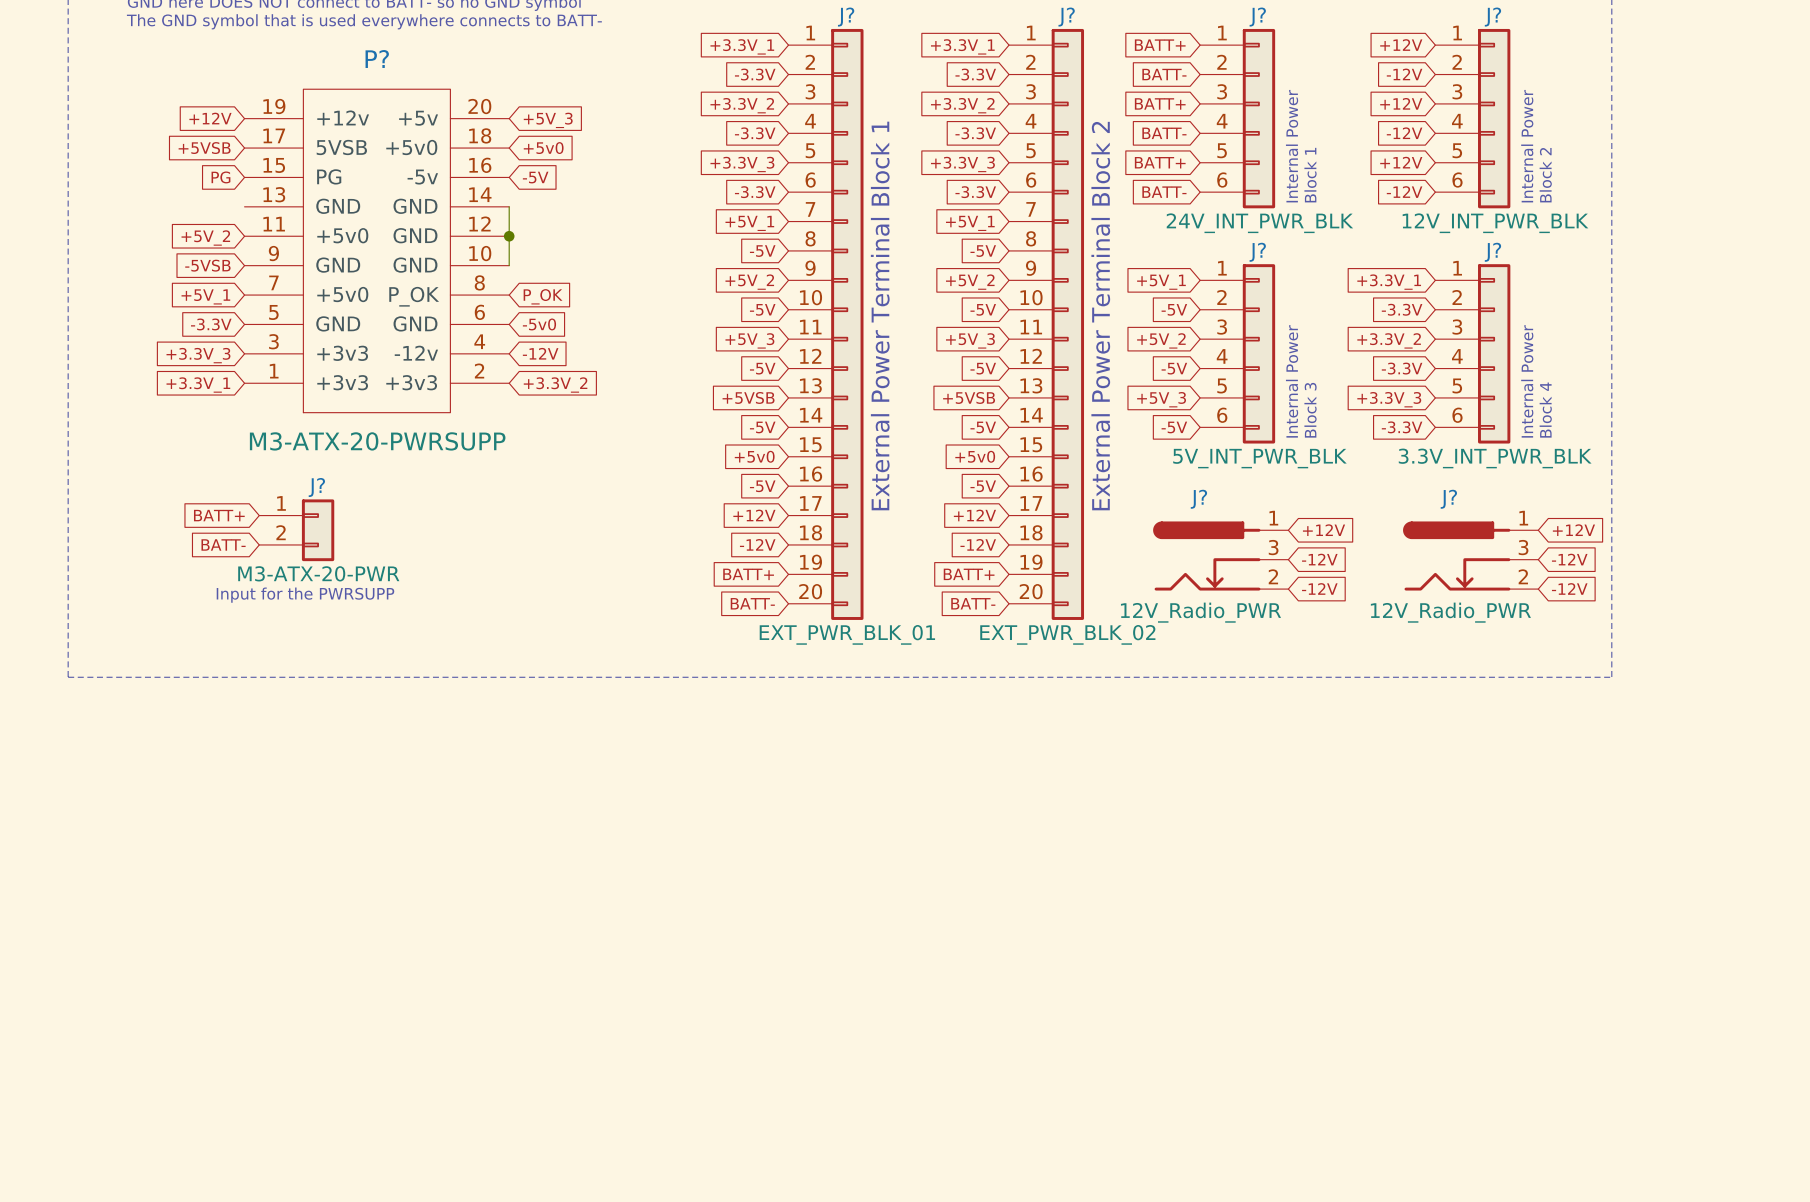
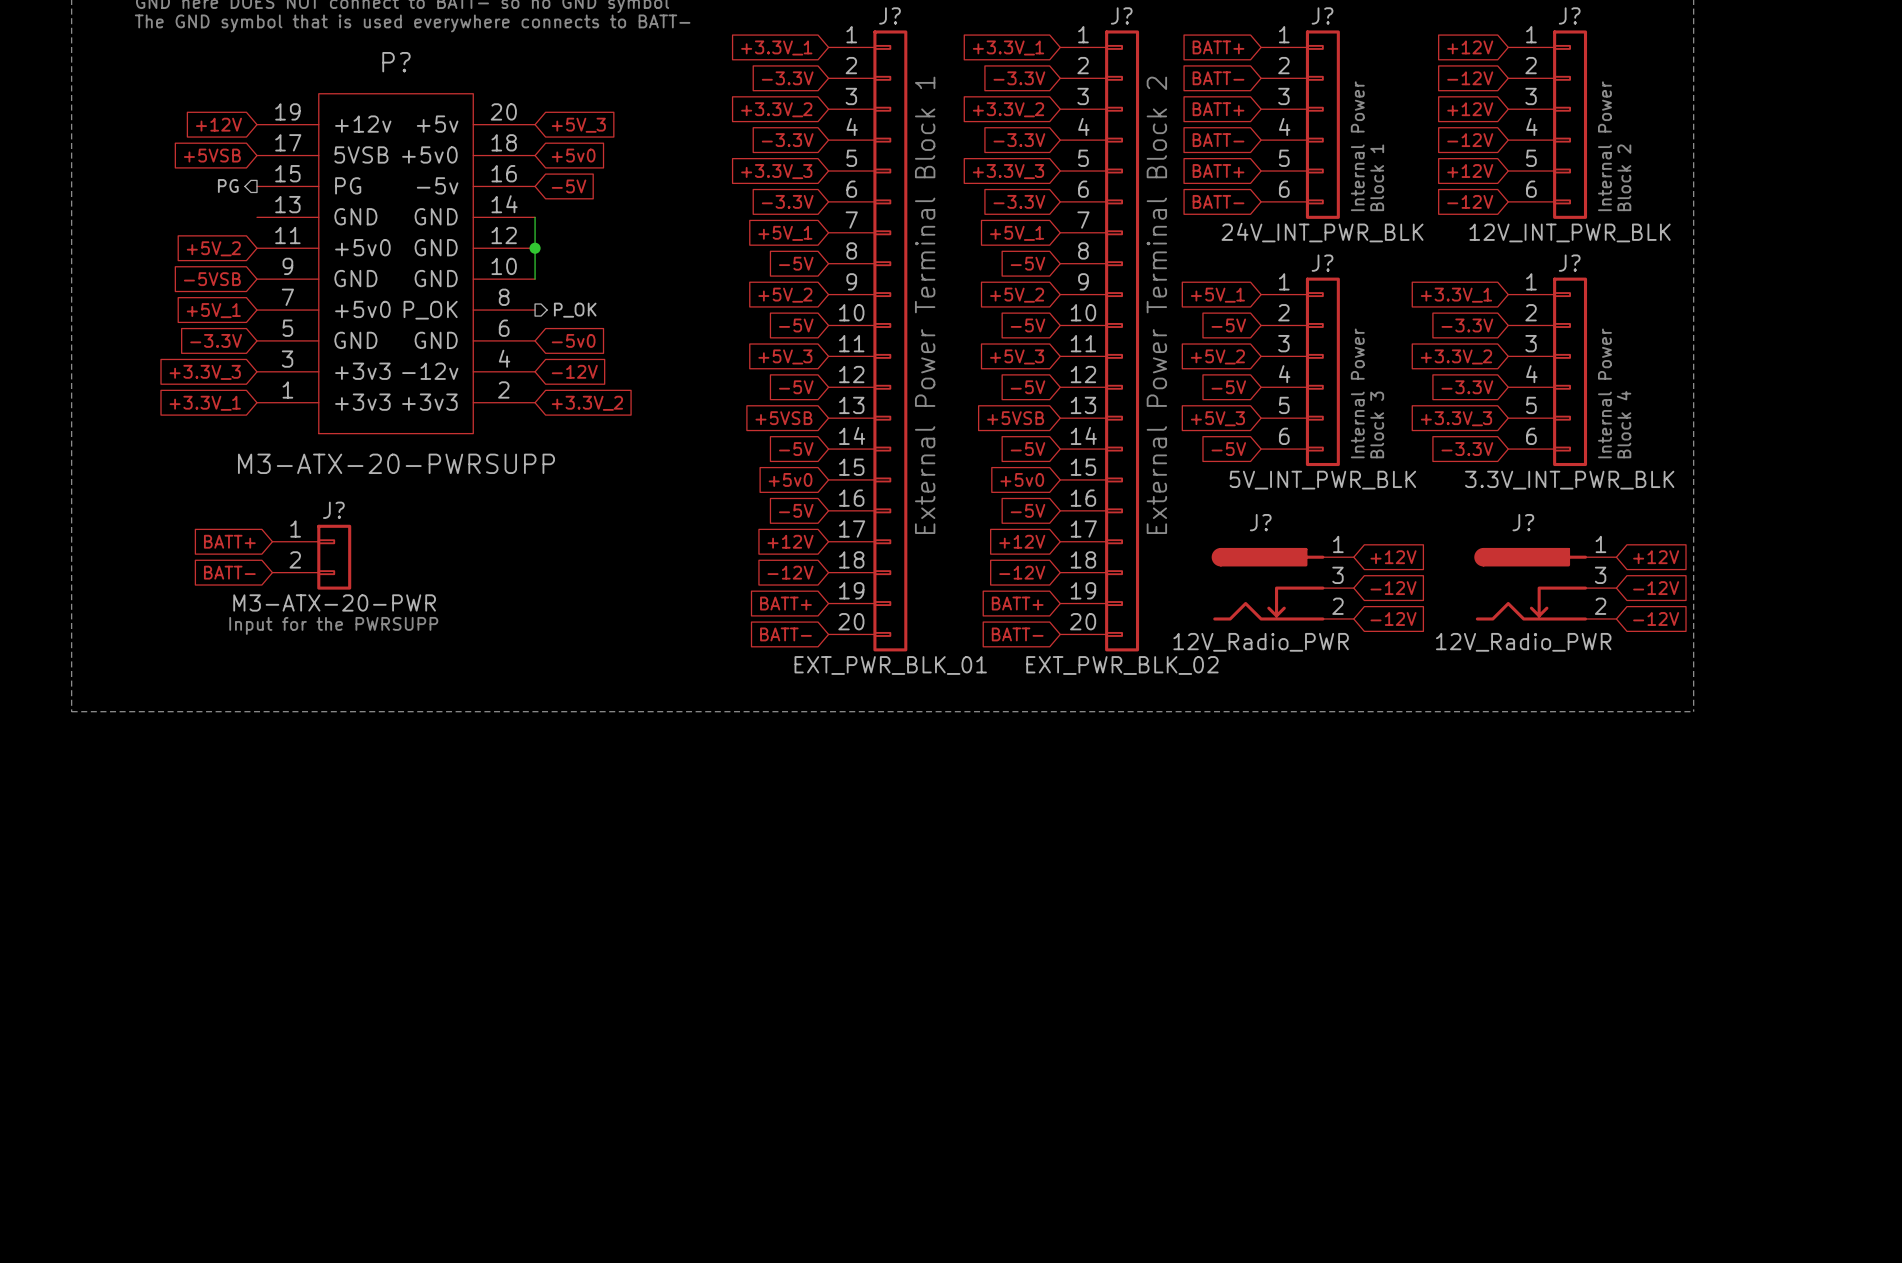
hierarchical label: none -> PG (228, 186)
global label: PG (220, 177) -> none
global label: P_OK (543, 296) -> none
hierarchical label: none -> P_OK (575, 310)

